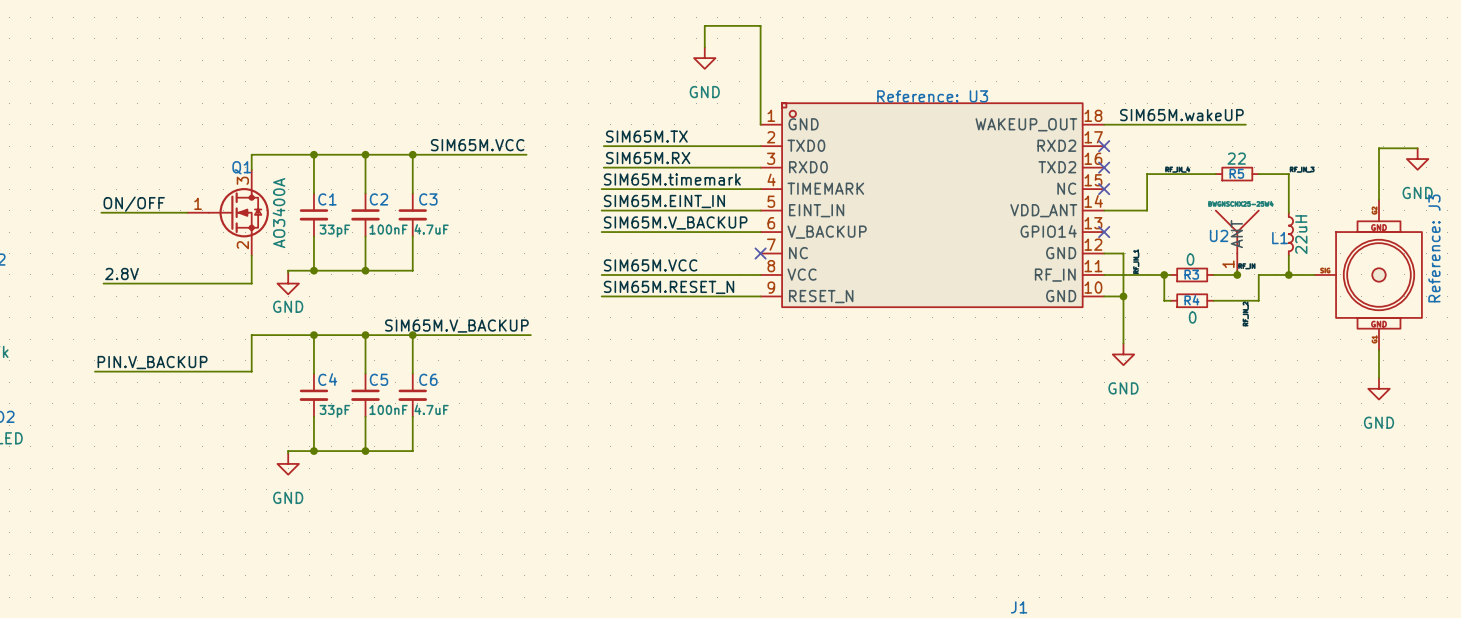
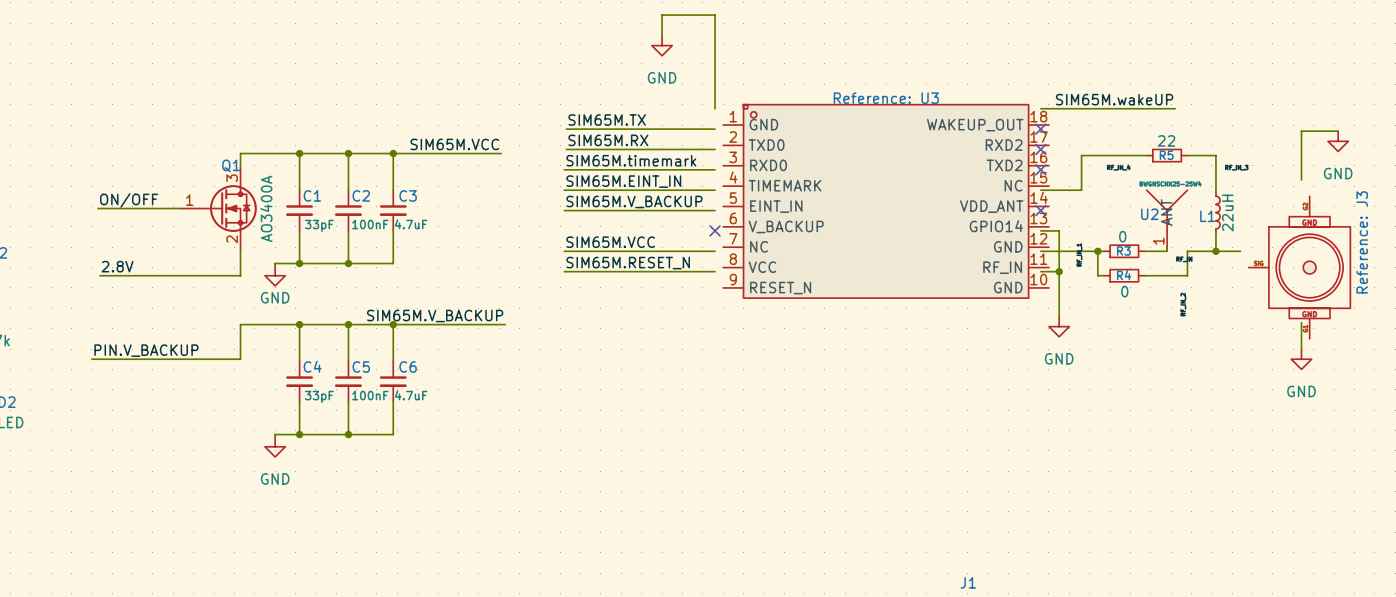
wire: (704, 47) (704, 25) (760, 25) (760, 124) -> (662, 35) (662, 15) (715, 15) (715, 108)
power symbol position: GND (704, 58) -> GND (662, 45)
label position: SIM65M.wakeUP (1181, 115) -> SIM65M.wakeUP (1114, 99)
wire: (1104, 124) (1245, 124) -> (1040, 108) (1175, 108)
no-connect mark: none -> (1040, 129)
label position: SIM65M.TX (646, 136) -> SIM65M.TX (607, 120)
wire: (603, 146) (760, 146) -> (566, 129) (715, 129)
no-connect mark: (1104, 146) -> none
wire: (1417, 148) (1378, 148) (1378, 199) -> (1338, 131) (1301, 131) (1301, 180)
no-connect mark: none -> (1040, 149)
label position: SIM65M.RX (648, 158) -> SIM65M.RX (608, 140)
power symbol position: GND (1417, 159) -> GND (1338, 141)
wire: (603, 167) (760, 167) -> (566, 149) (715, 149)
no-connect mark: (1104, 167) -> none
no-connect mark: none -> (1040, 169)
wire: (1215, 174) (1147, 174) (1147, 210) (1104, 210) -> (1146, 155) (1081, 155) (1081, 190) (1040, 190)
R5 position: (1237, 174) -> (1167, 155)
wire: (1258, 174) (1288, 174) (1288, 212) -> (1187, 155) (1215, 155) (1215, 192)
label position: SIM65M.timemark (672, 179) -> SIM65M.timemark (631, 160)
wire: (601, 189) (760, 189) -> (564, 169) (715, 169)
no-connect mark: (1104, 189) -> none
label position: SIM65M.EINT_IN (664, 201) -> SIM65M.EINT_IN (623, 181)
wire: (601, 210) (760, 210) -> (564, 190) (715, 190)
no-connect mark: none -> (1040, 210)
label position: SIM65M.V_BACKUP (675, 222) -> SIM65M.V_BACKUP (634, 201)
wire: (601, 232) (760, 232) -> (564, 210) (715, 210)
no-connect mark: (1104, 232) -> none
L1 position: (1290, 234) -> (1218, 212)
U2 position: (1237, 242) -> (1167, 220)
no-connect mark position: (760, 253) -> (715, 230)
wire: (1104, 253) (1123, 253) (1123, 343) -> (1040, 230) (1059, 230) (1059, 316)
wire: (1288, 255) (1288, 274) -> (1215, 232) (1215, 251)
label position: SIM65M.VCC (650, 265) -> SIM65M.VCC (610, 242)
wire: (1237, 270) (1237, 274) (1213, 274) -> (1167, 247) (1167, 251) (1144, 251)
wire: (601, 274) (760, 274) -> (564, 251) (715, 251)
wire: (1104, 274) (1170, 274) -> (1040, 251) (1103, 251)
wire: (1164, 274) (1164, 300) (1170, 300) -> (1097, 251) (1097, 275) (1103, 275)
junction position: (1164, 274) -> (1097, 251)
R3 position: (1192, 274) -> (1124, 251)
junction: (1237, 274) -> none
junction position: (1288, 274) -> (1215, 251)
wire: (1314, 274) (1258, 274) (1258, 300) (1213, 300) -> (1240, 251) (1187, 251) (1187, 275) (1144, 275)
label position: SIM65M.RESET_N (669, 287) -> SIM65M.RESET_N (628, 263)
wire: (601, 296) (760, 296) -> (564, 271) (715, 271)
wire: (1104, 296) (1123, 296) -> (1040, 271) (1059, 271)
junction position: (1123, 296) -> (1059, 271)
R4 position: (1192, 300) -> (1124, 275)
wire: (1378, 350) (1378, 378) -> (1301, 322) (1301, 349)
power symbol position: GND (1123, 354) -> GND (1059, 326)
power symbol position: GND (1378, 388) -> GND (1301, 359)

